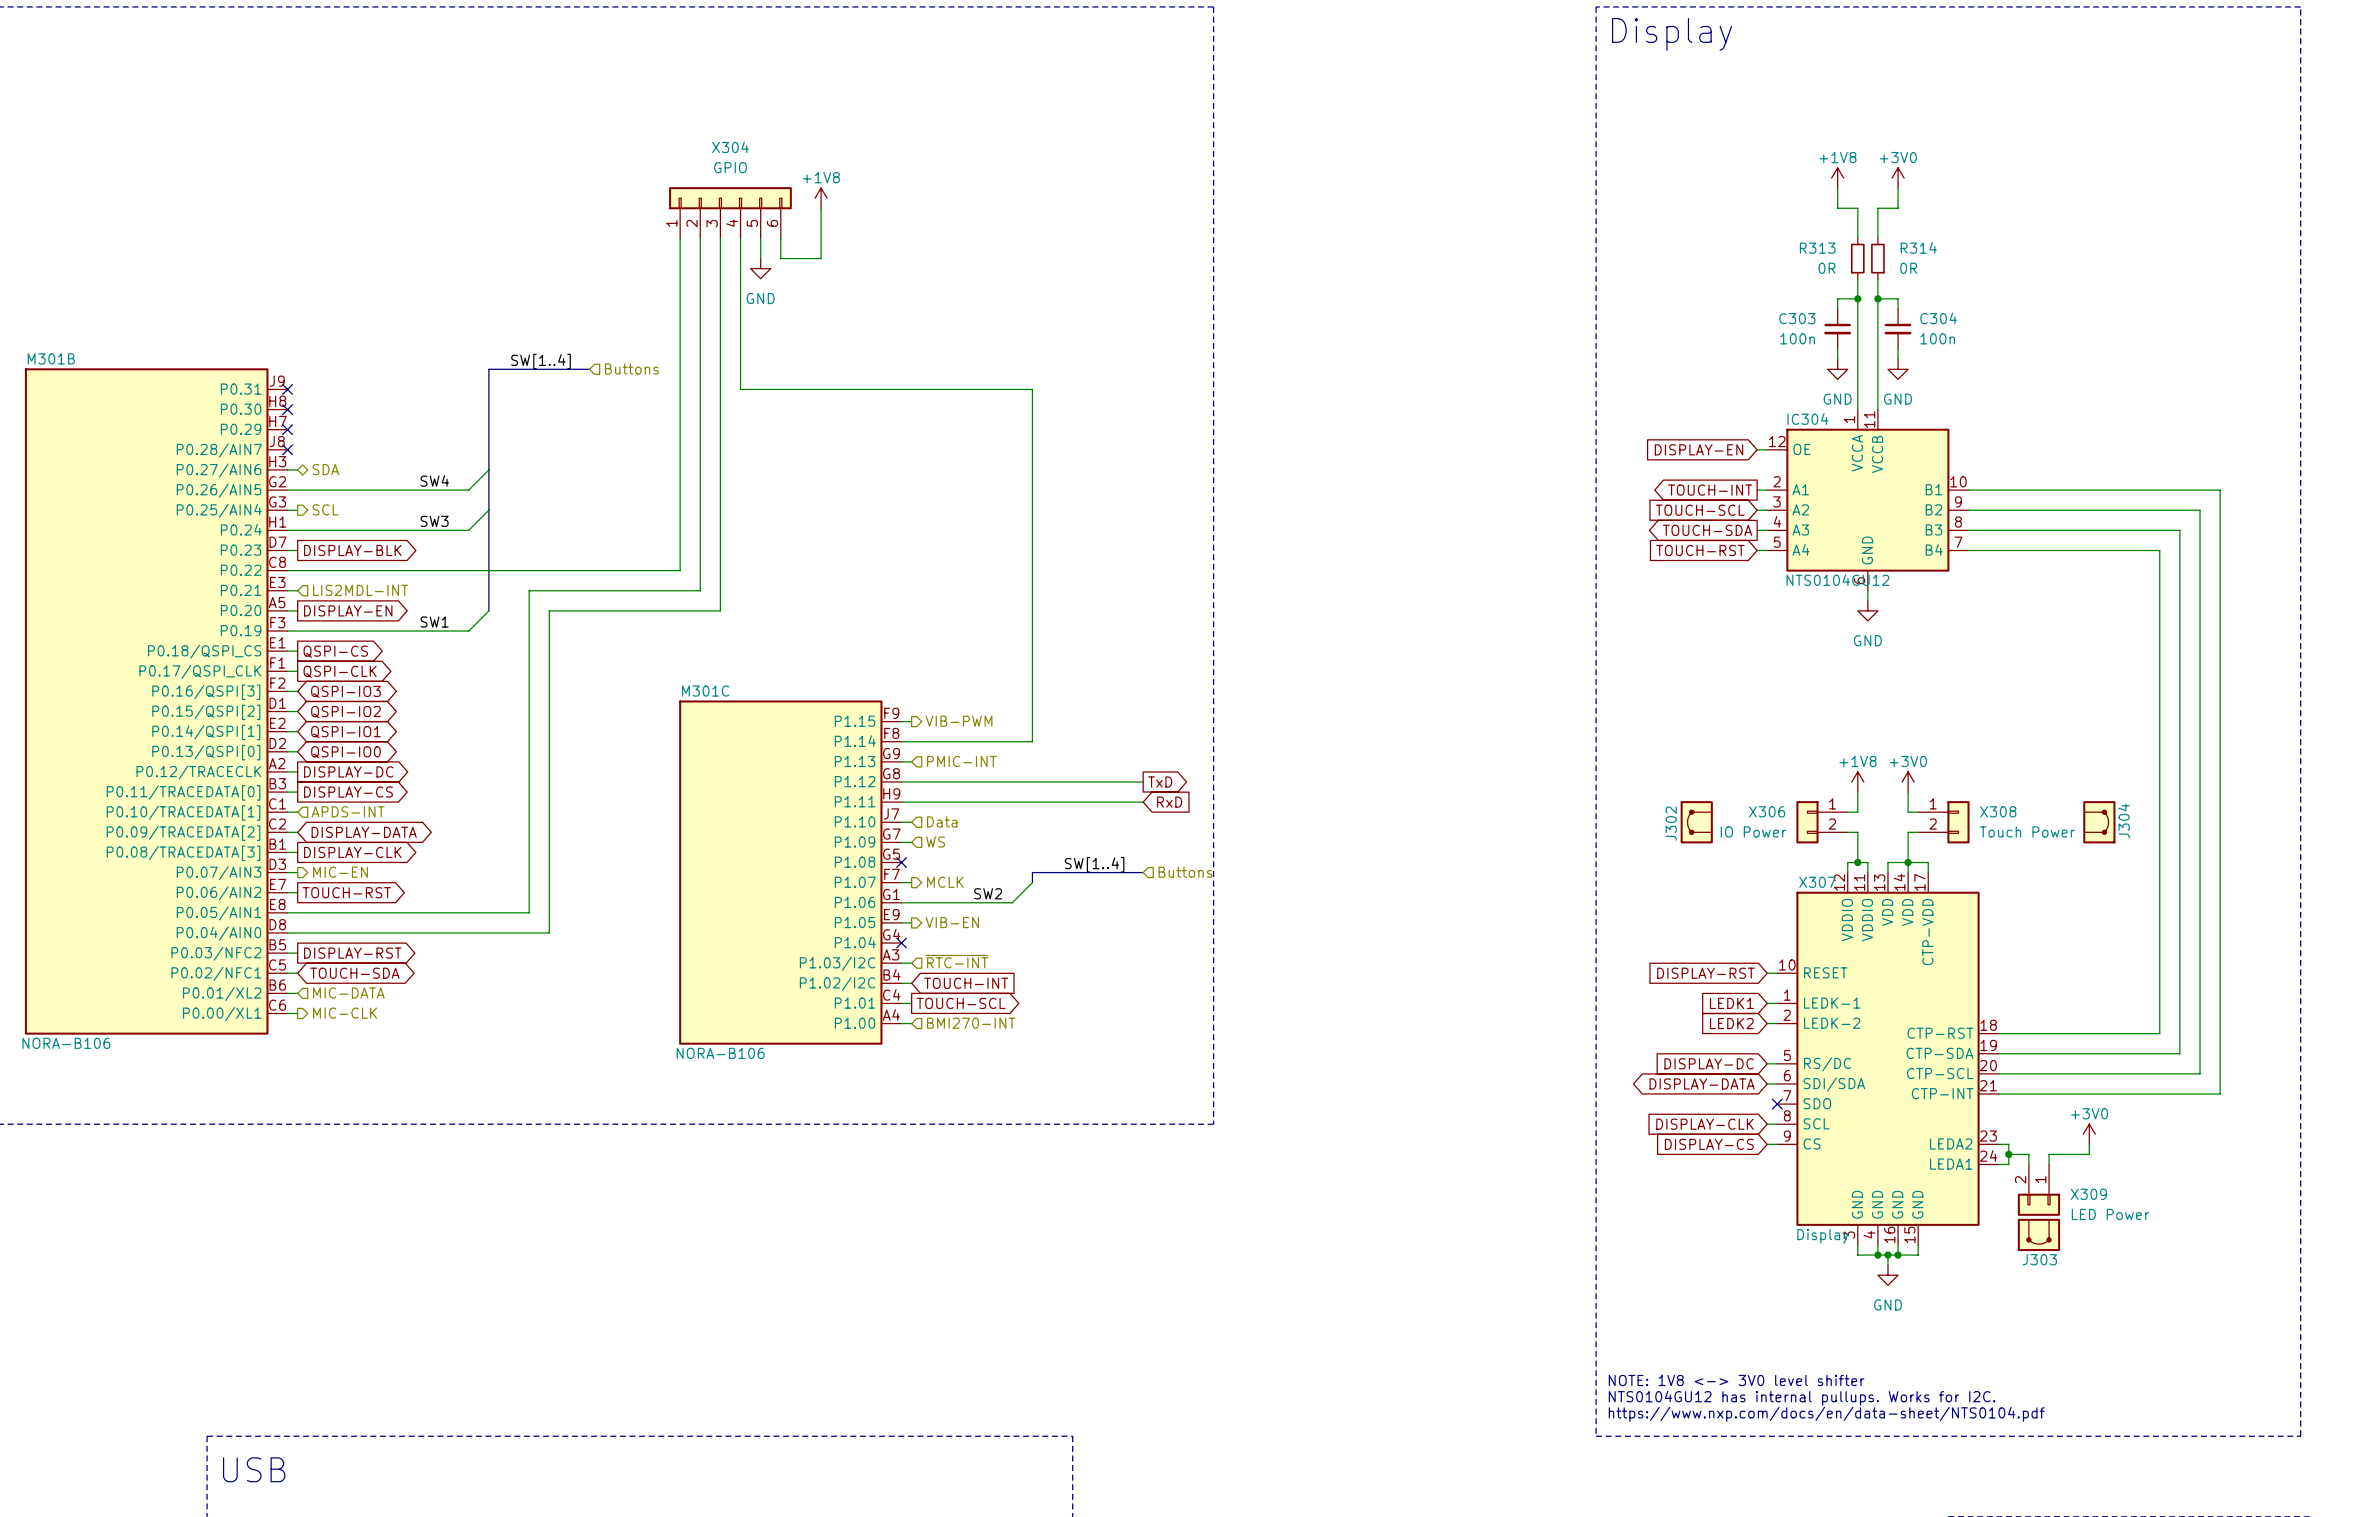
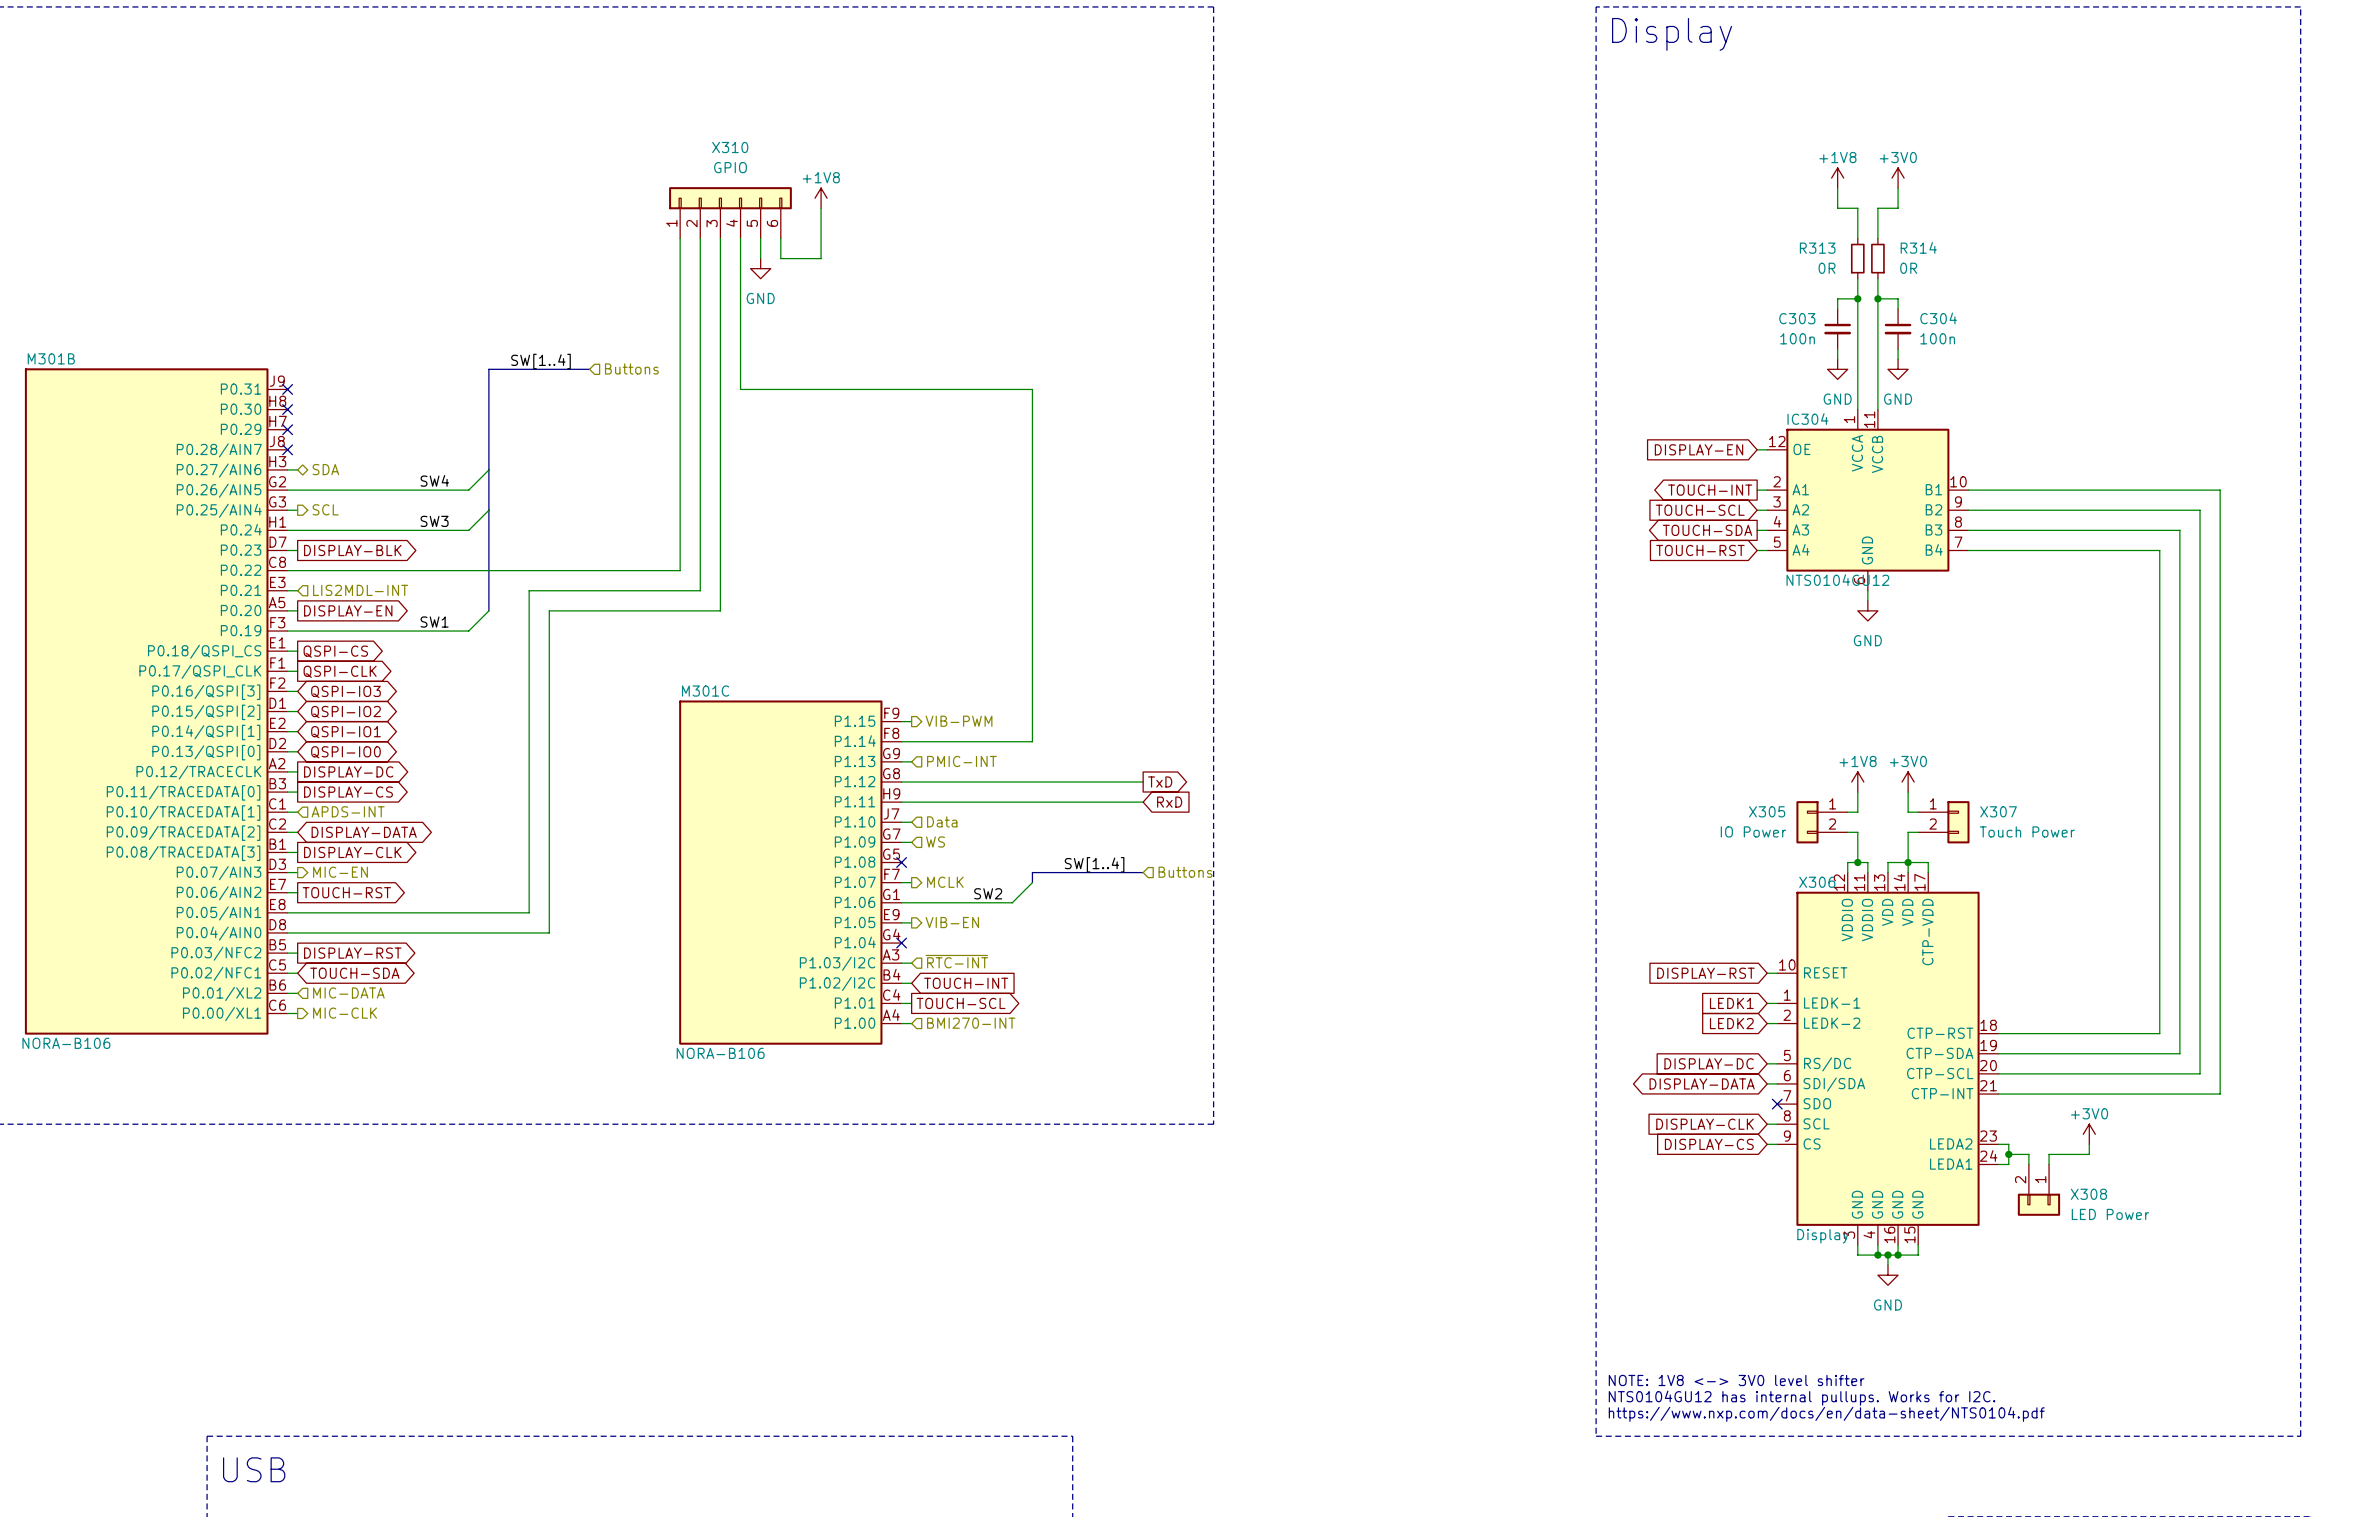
X304 name: X304 (730, 147) -> X310 (730, 147)
X306 name: X306 (1767, 811) -> X305 (1767, 811)
X308 name: X308 (1998, 811) -> X307 (1998, 811)
J302: (1696, 822) -> none
J304: (2099, 822) -> none
X307 name: X307 (1817, 882) -> X306 (1817, 882)
X309 name: X309 (2088, 1194) -> X308 (2088, 1194)
J303: (2038, 1234) -> none

